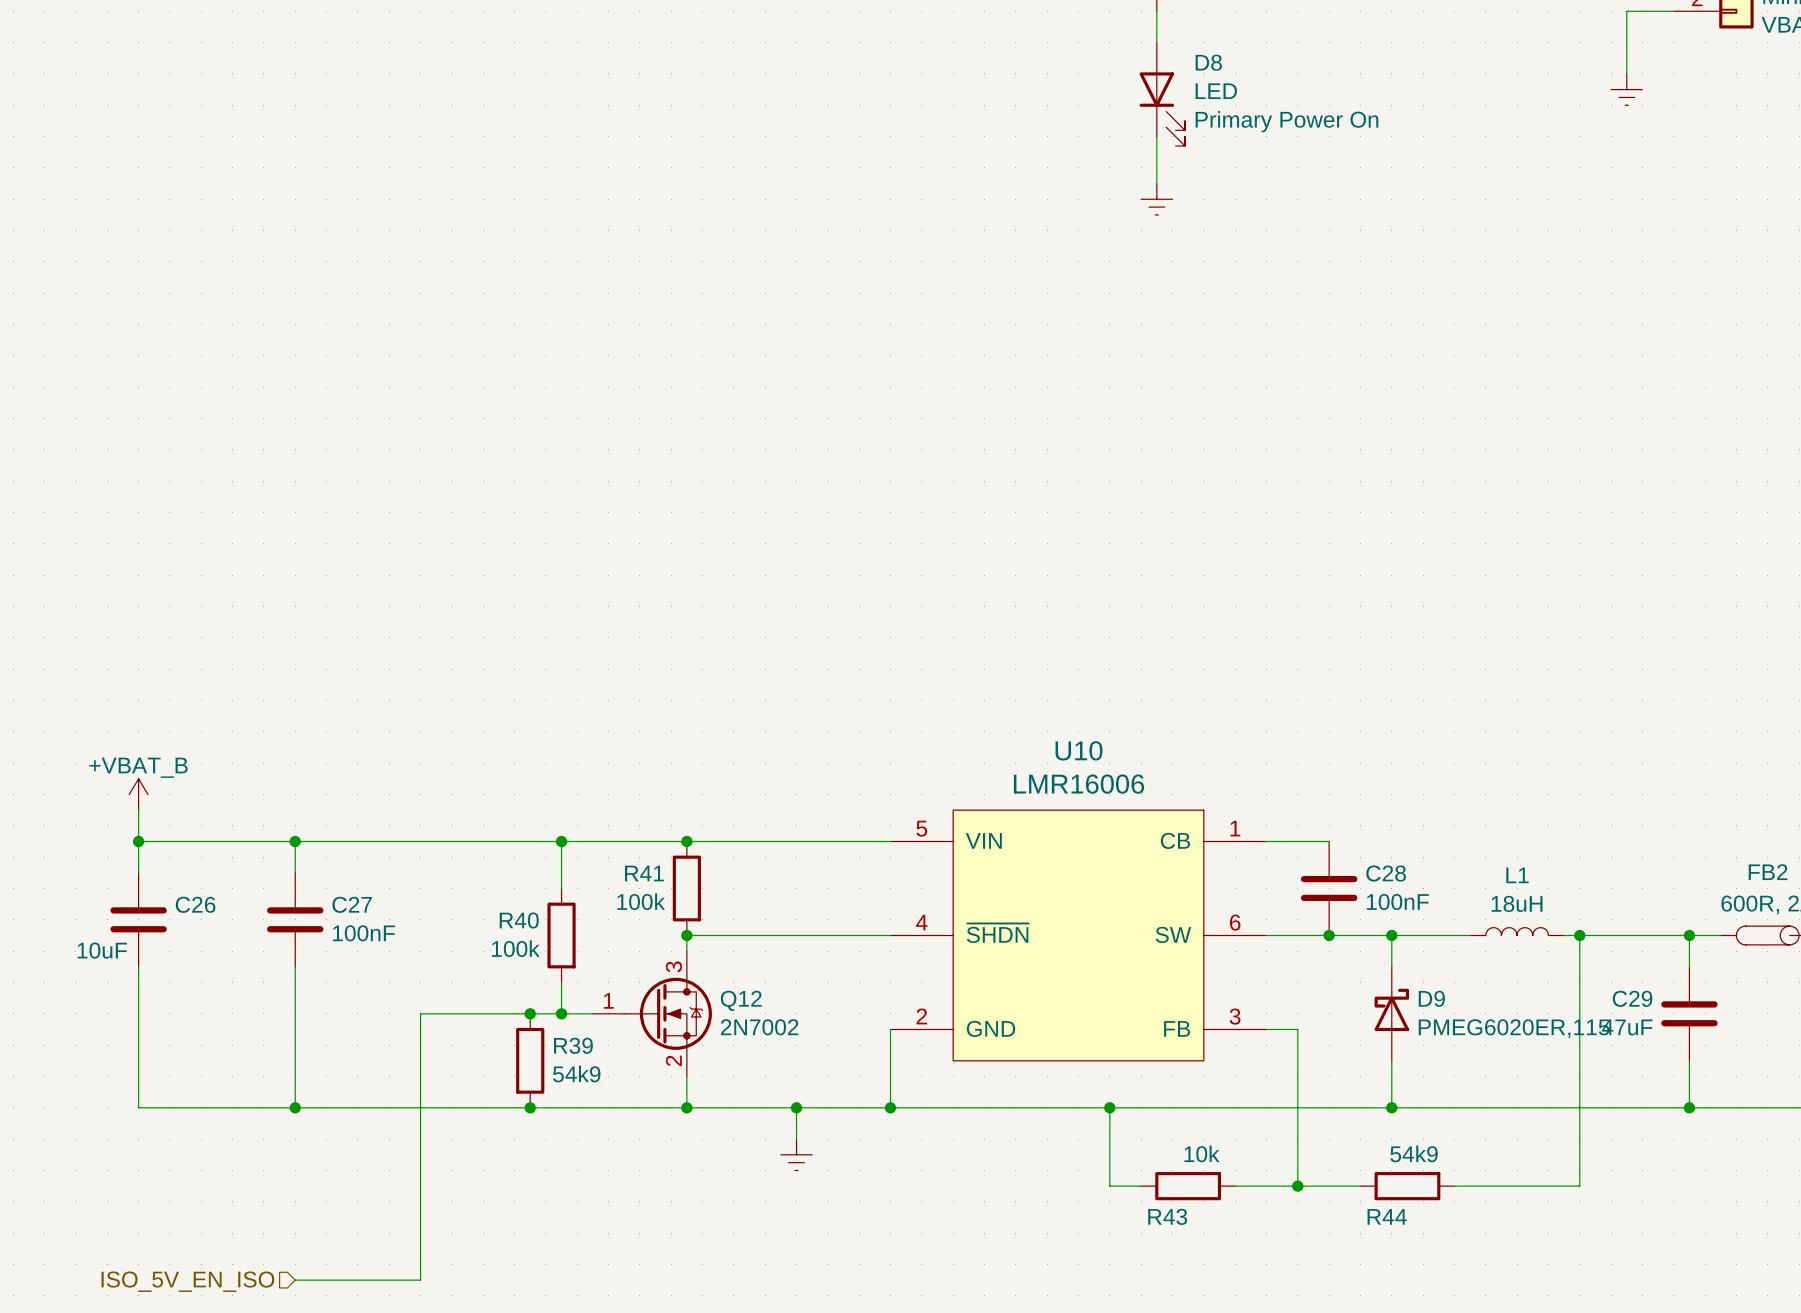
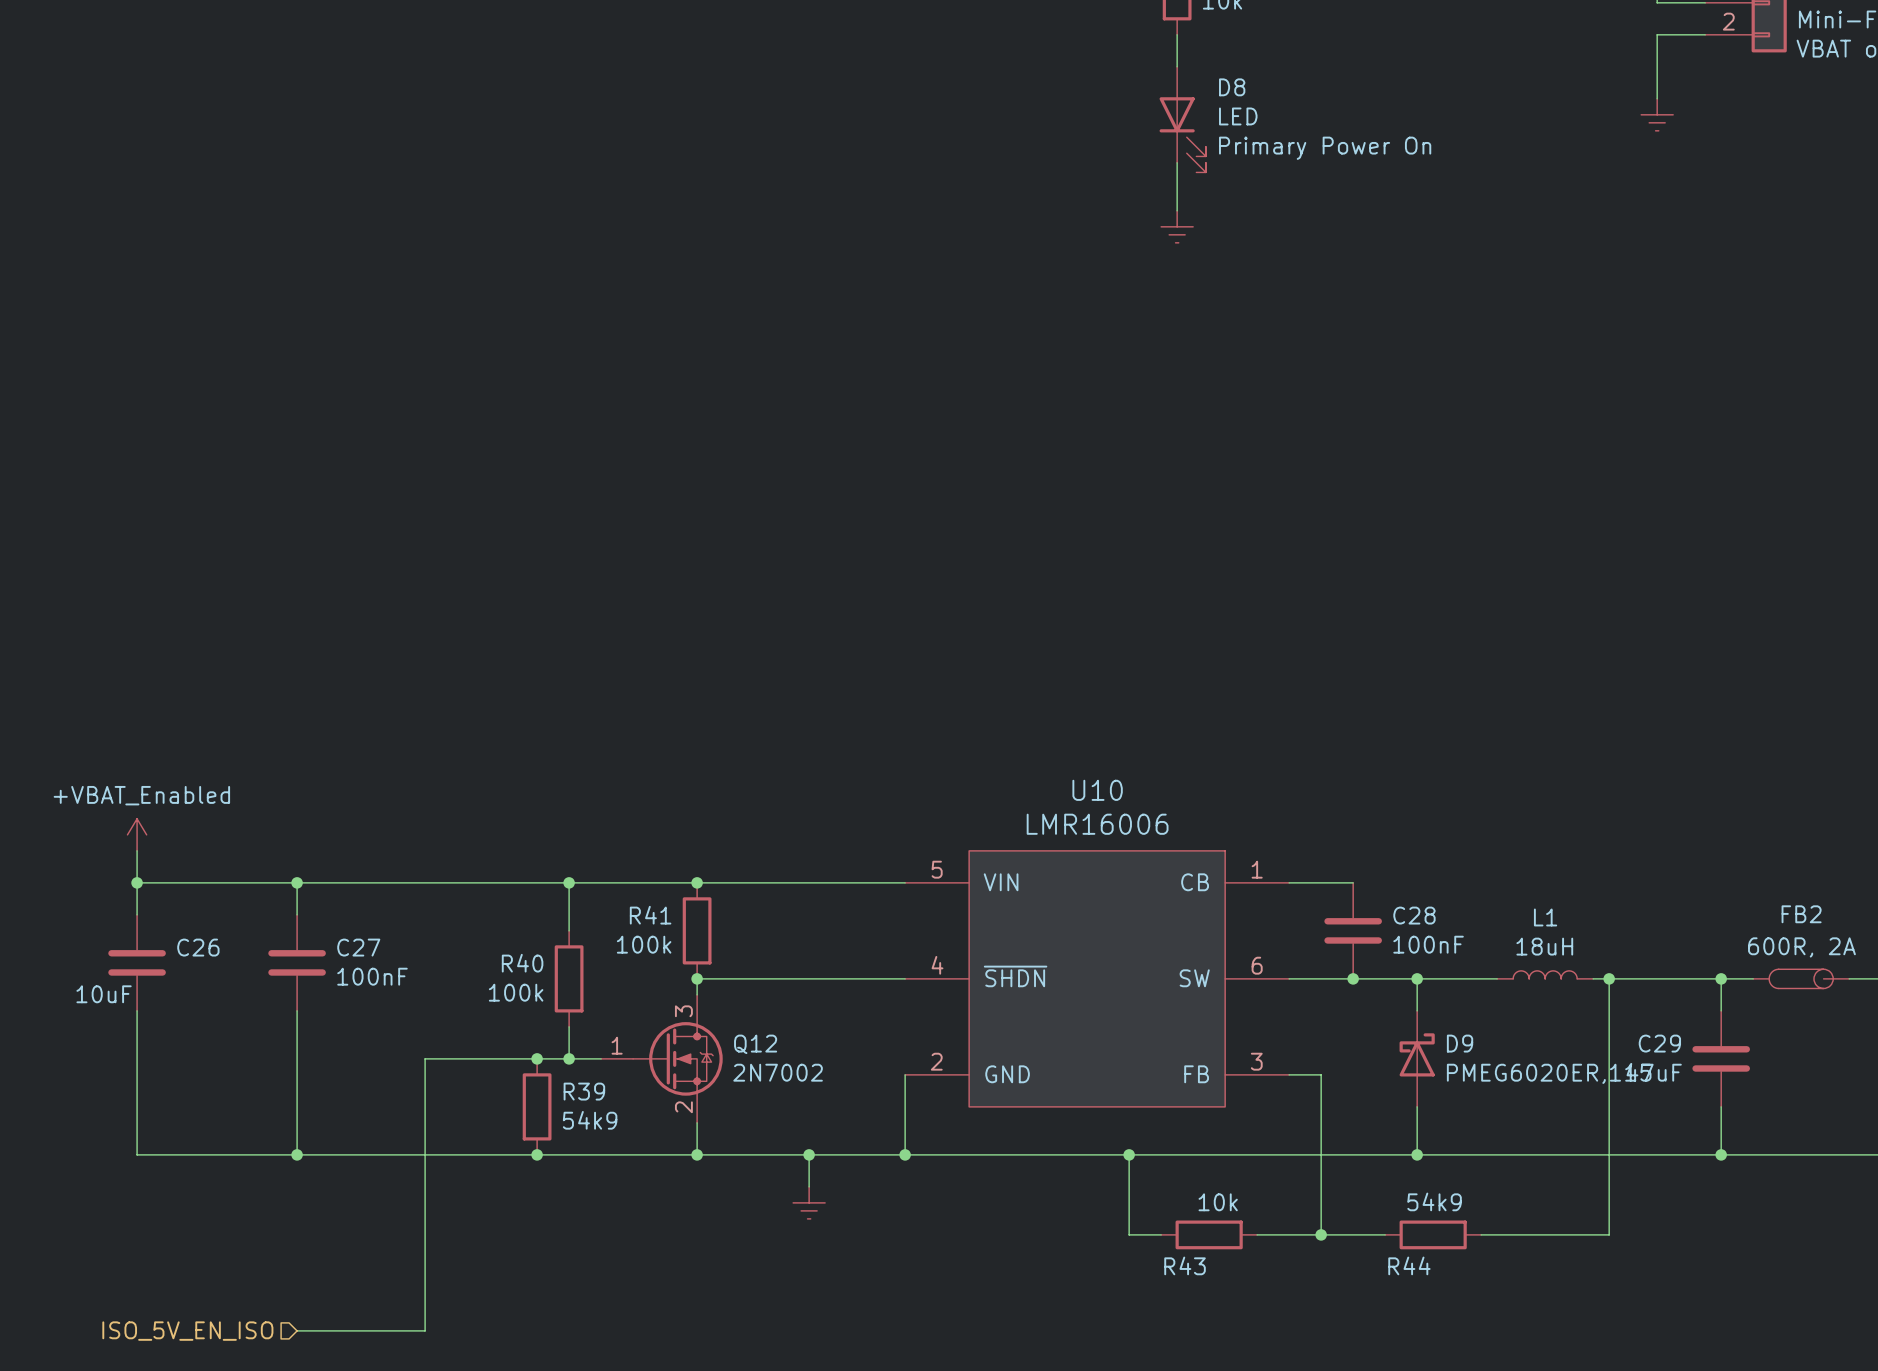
power symbol: +VBAT_B (138, 794) -> +VBAT_Enabled (137, 834)

